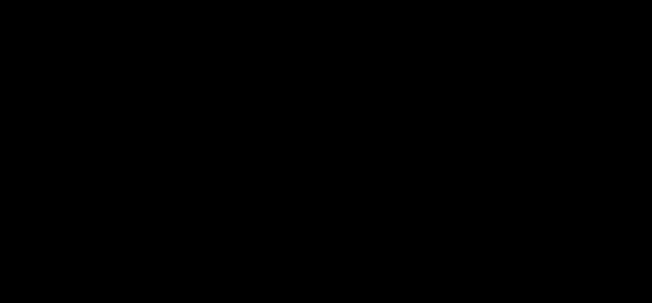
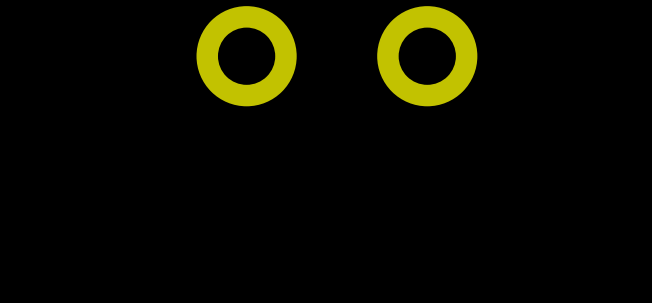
part: none -> (246, 56)
part: none -> (427, 56)

